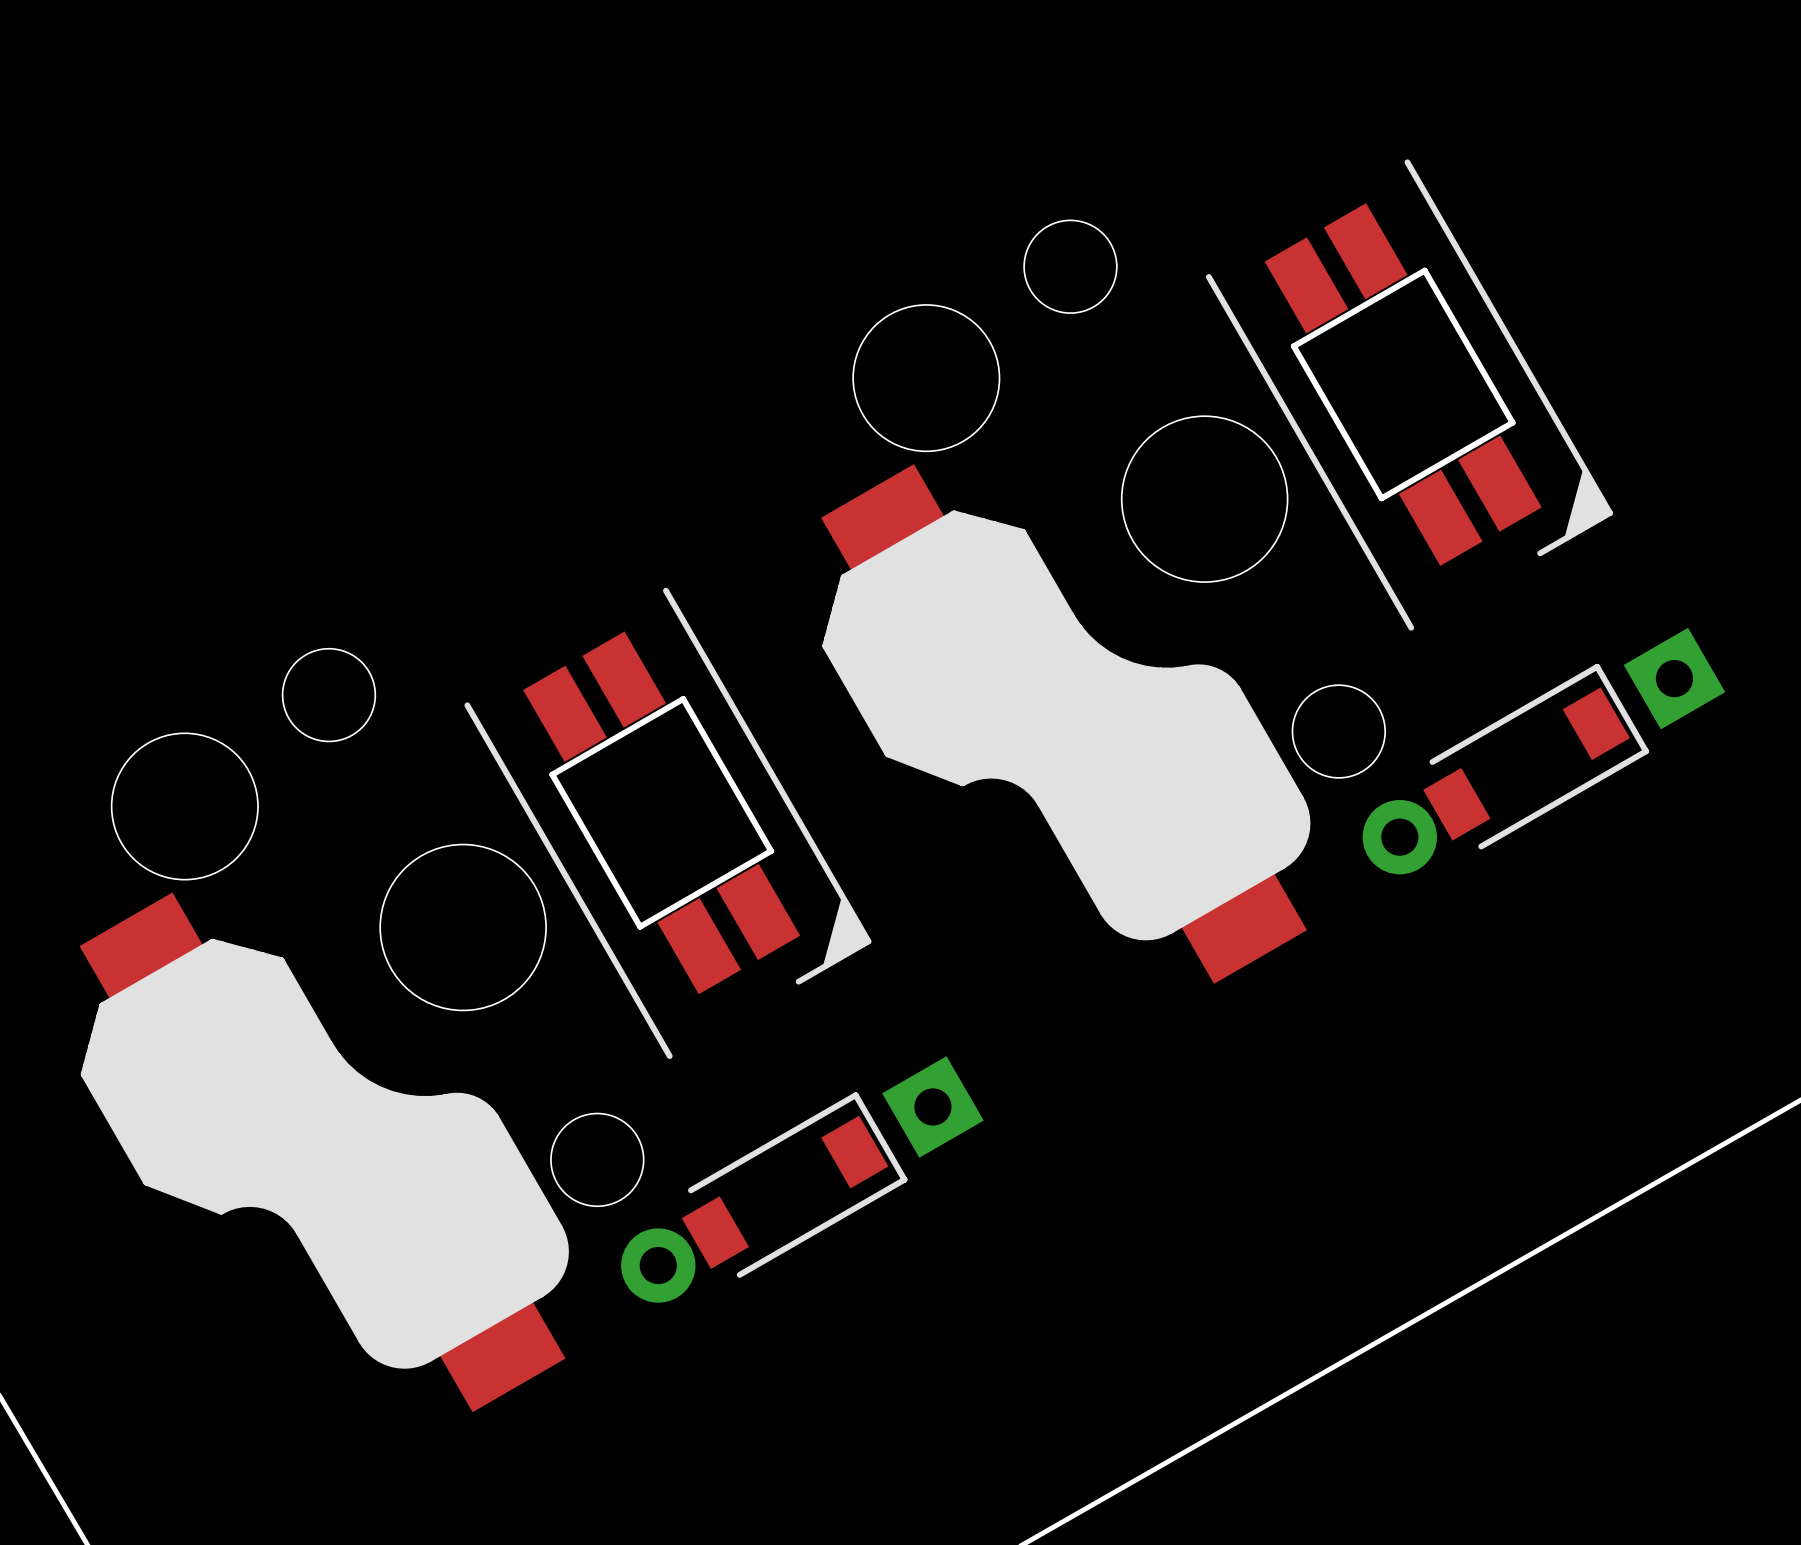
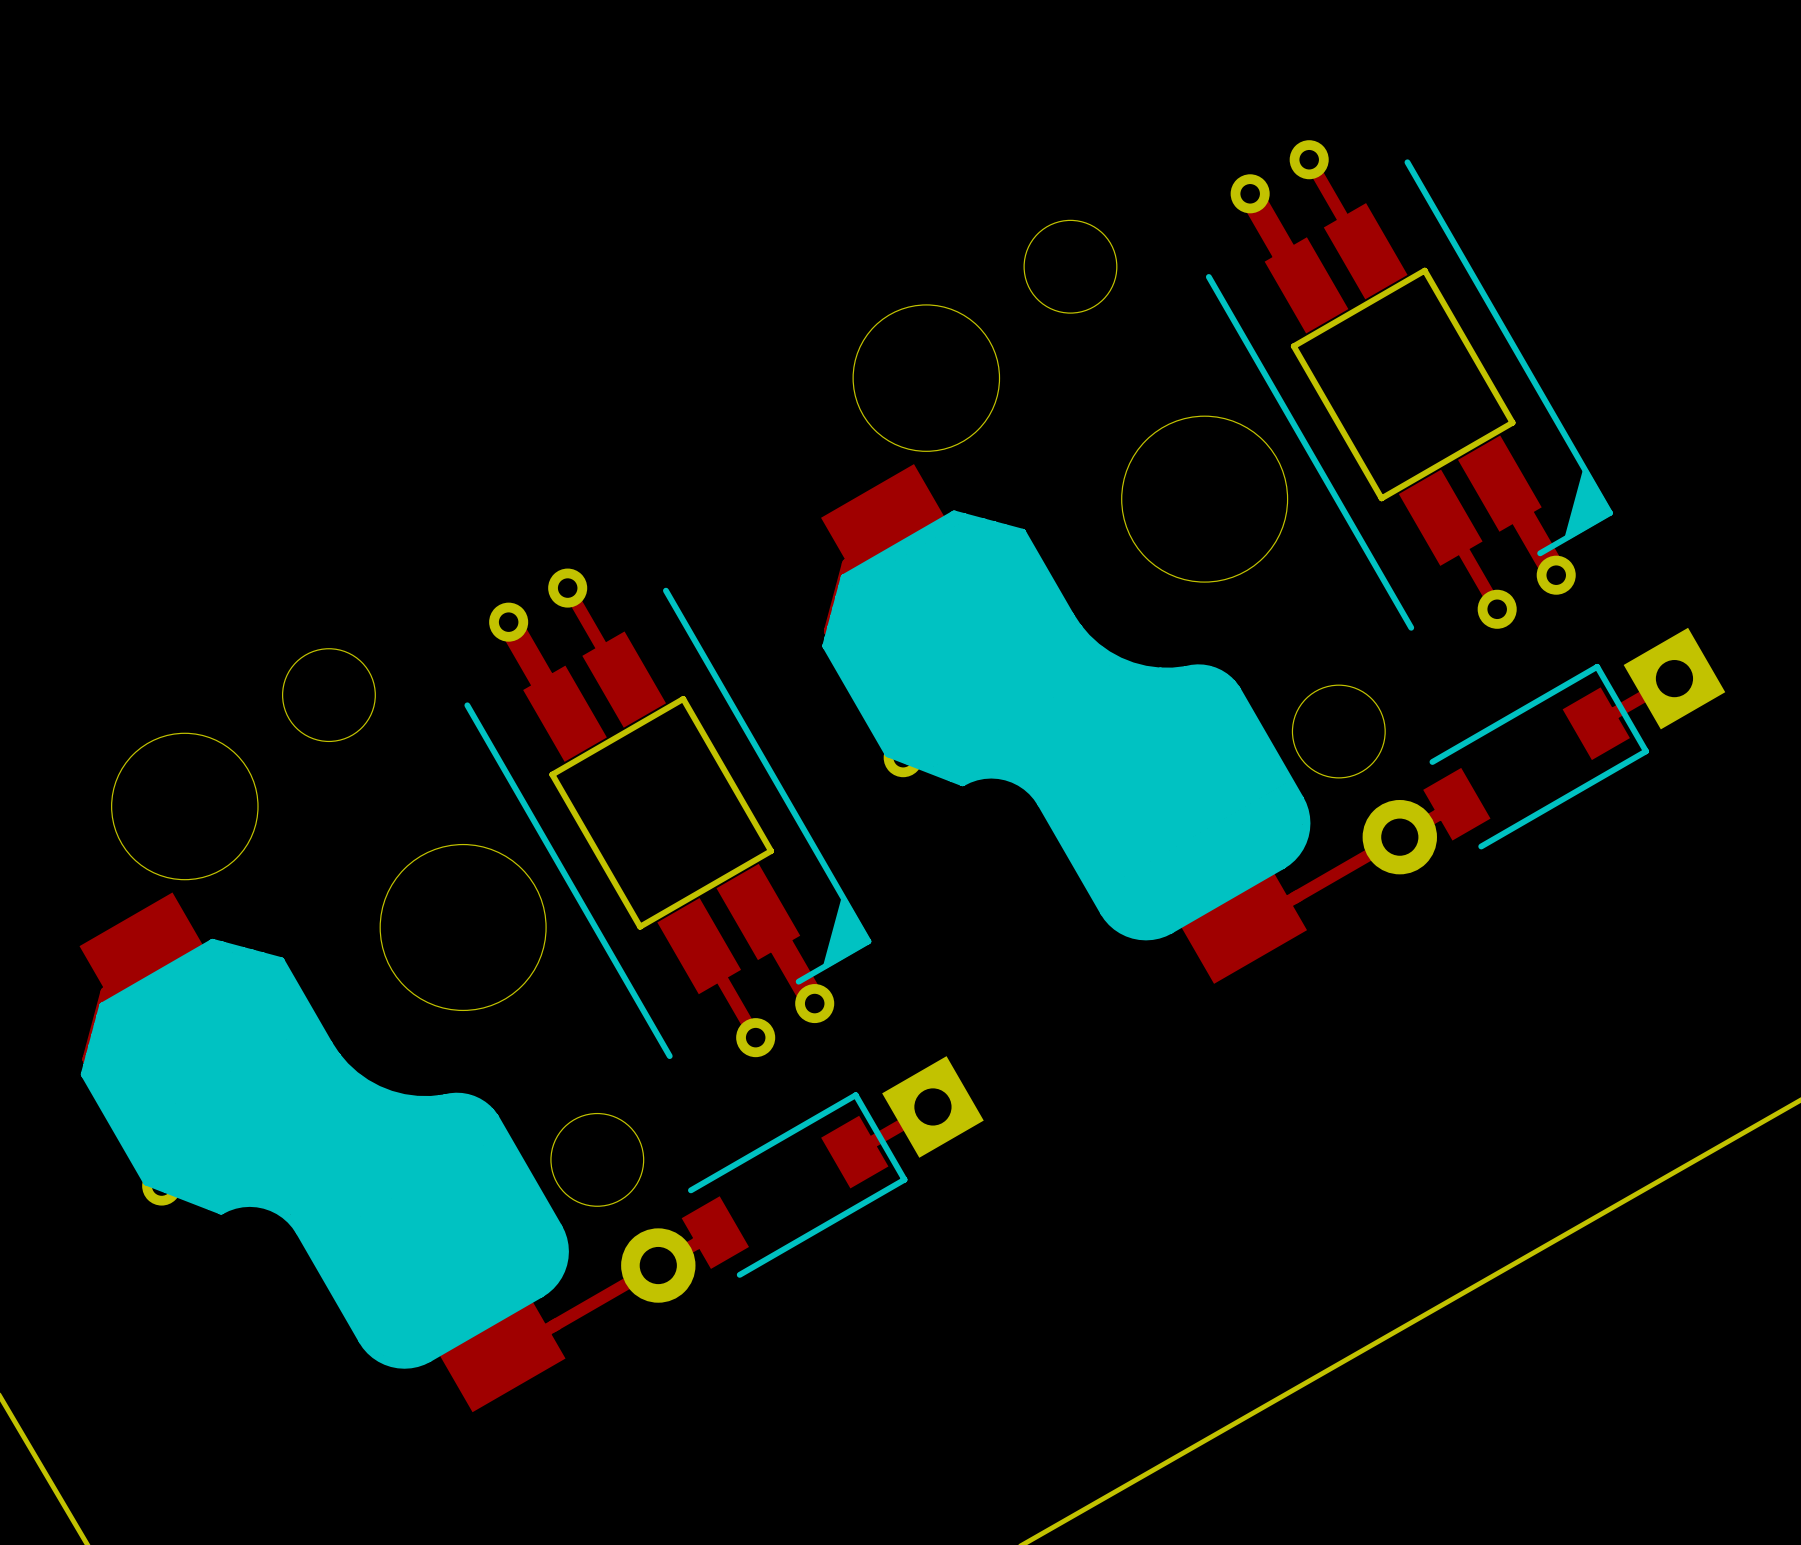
part footprint: [821, 159, 1726, 984] -> [821, 140, 1726, 984]
part footprint: [79, 587, 984, 1413] -> [79, 568, 984, 1413]

